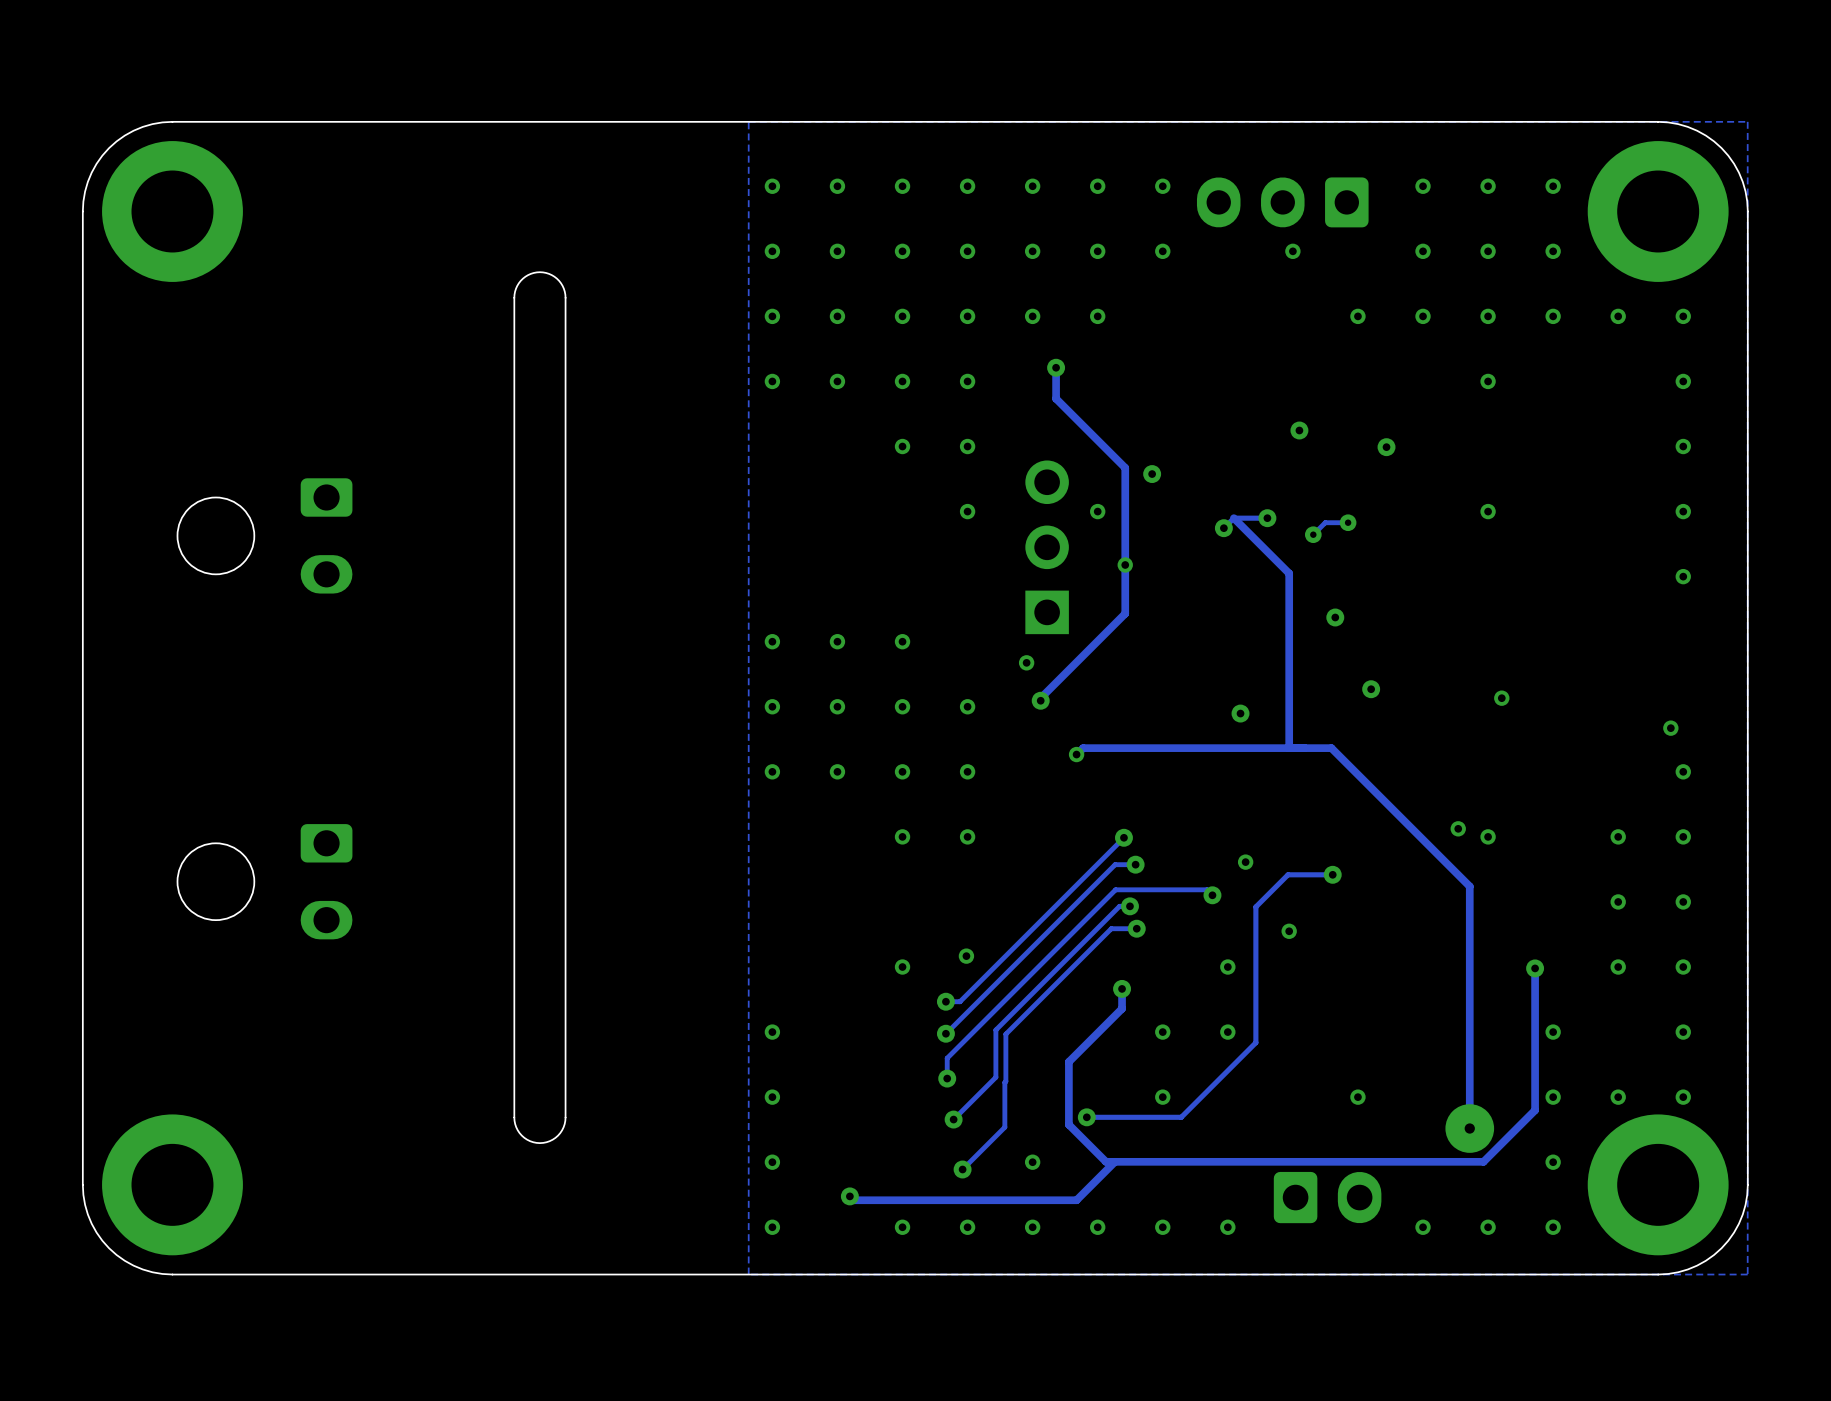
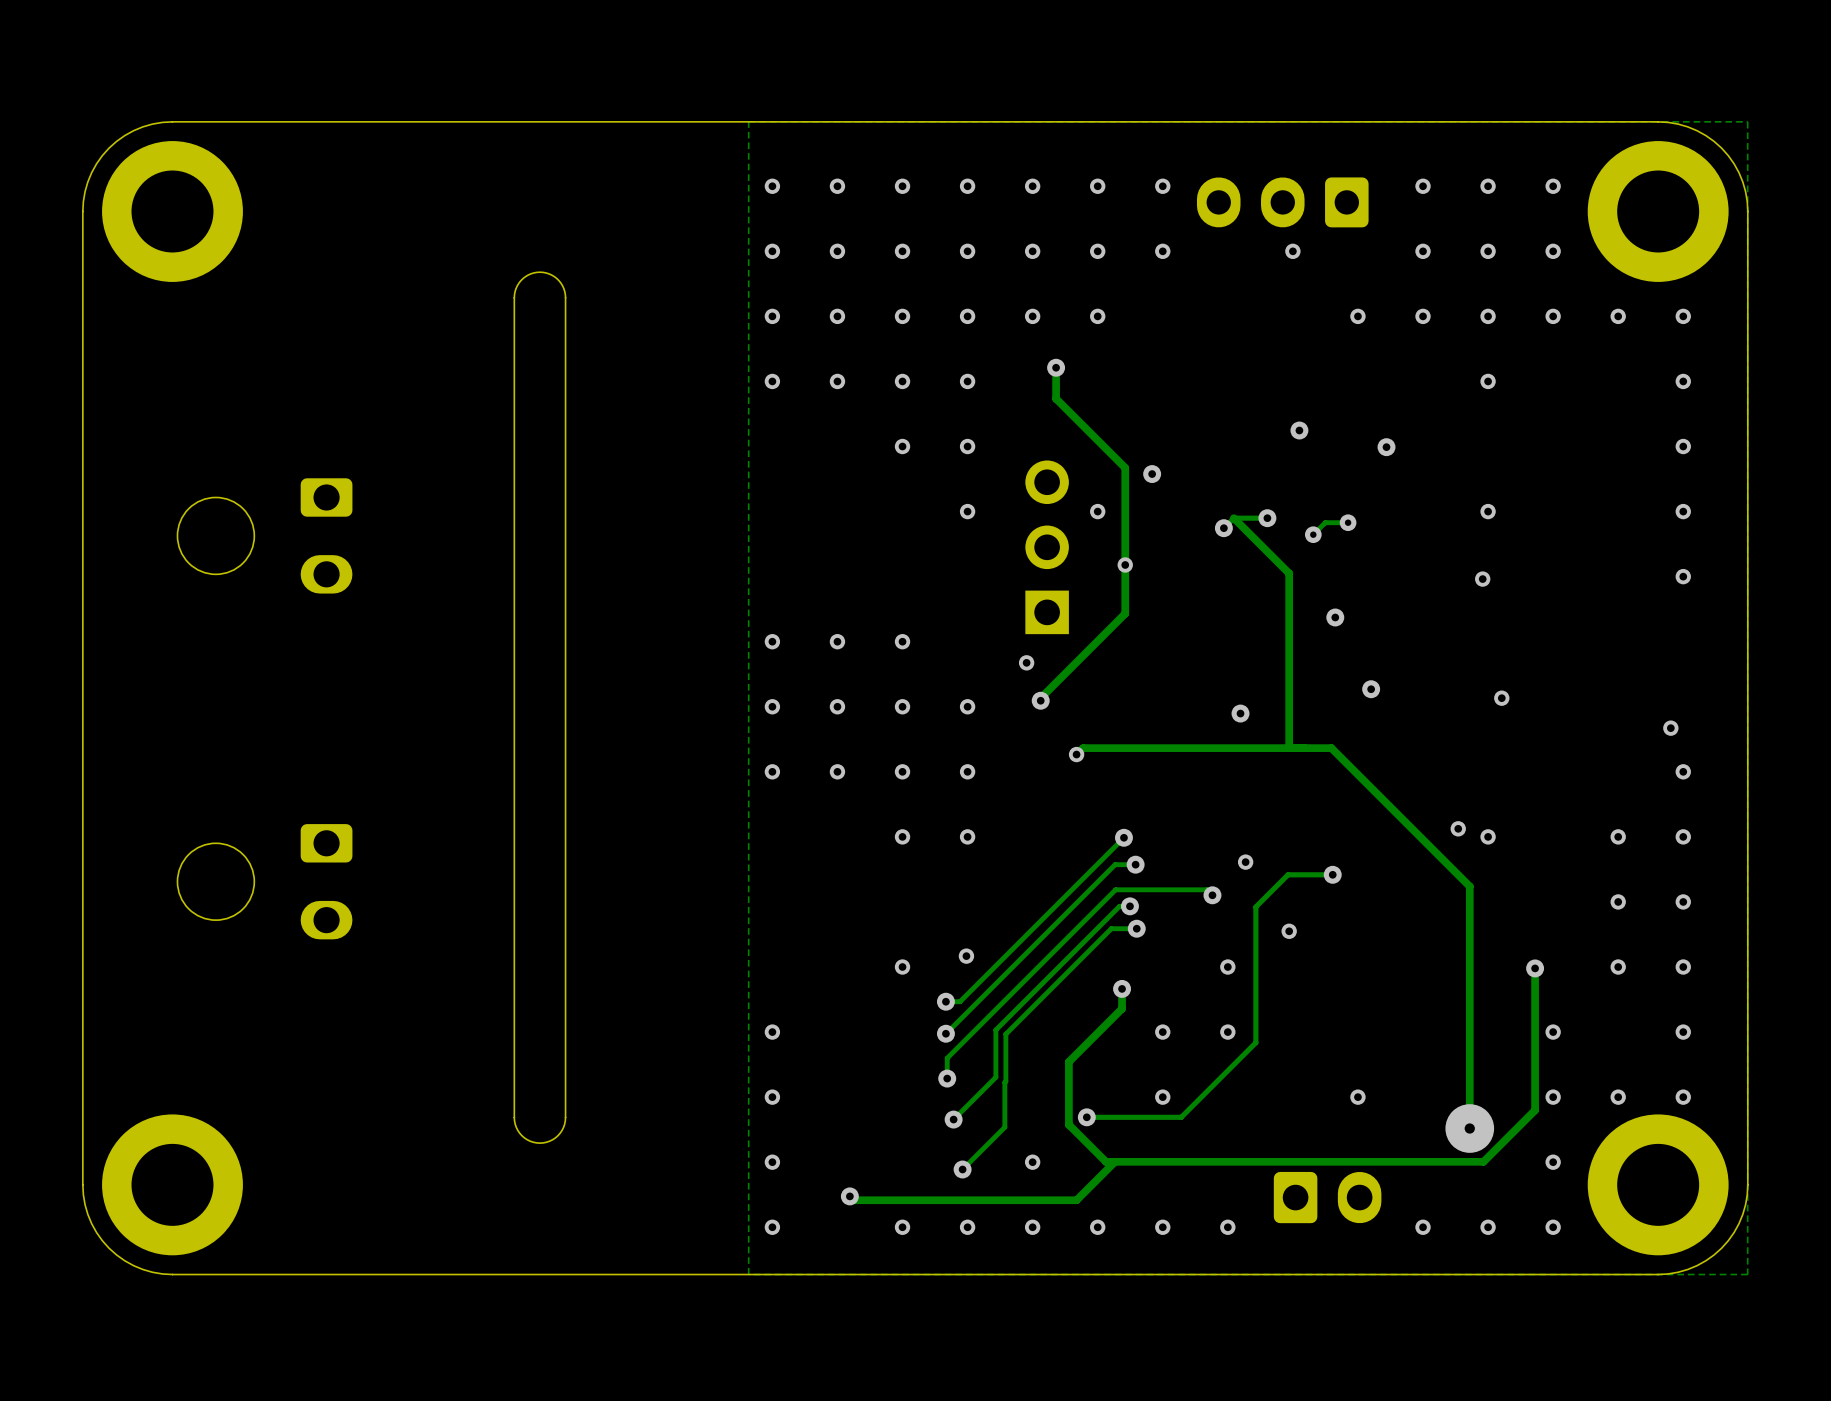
via: none -> (1482, 579)

